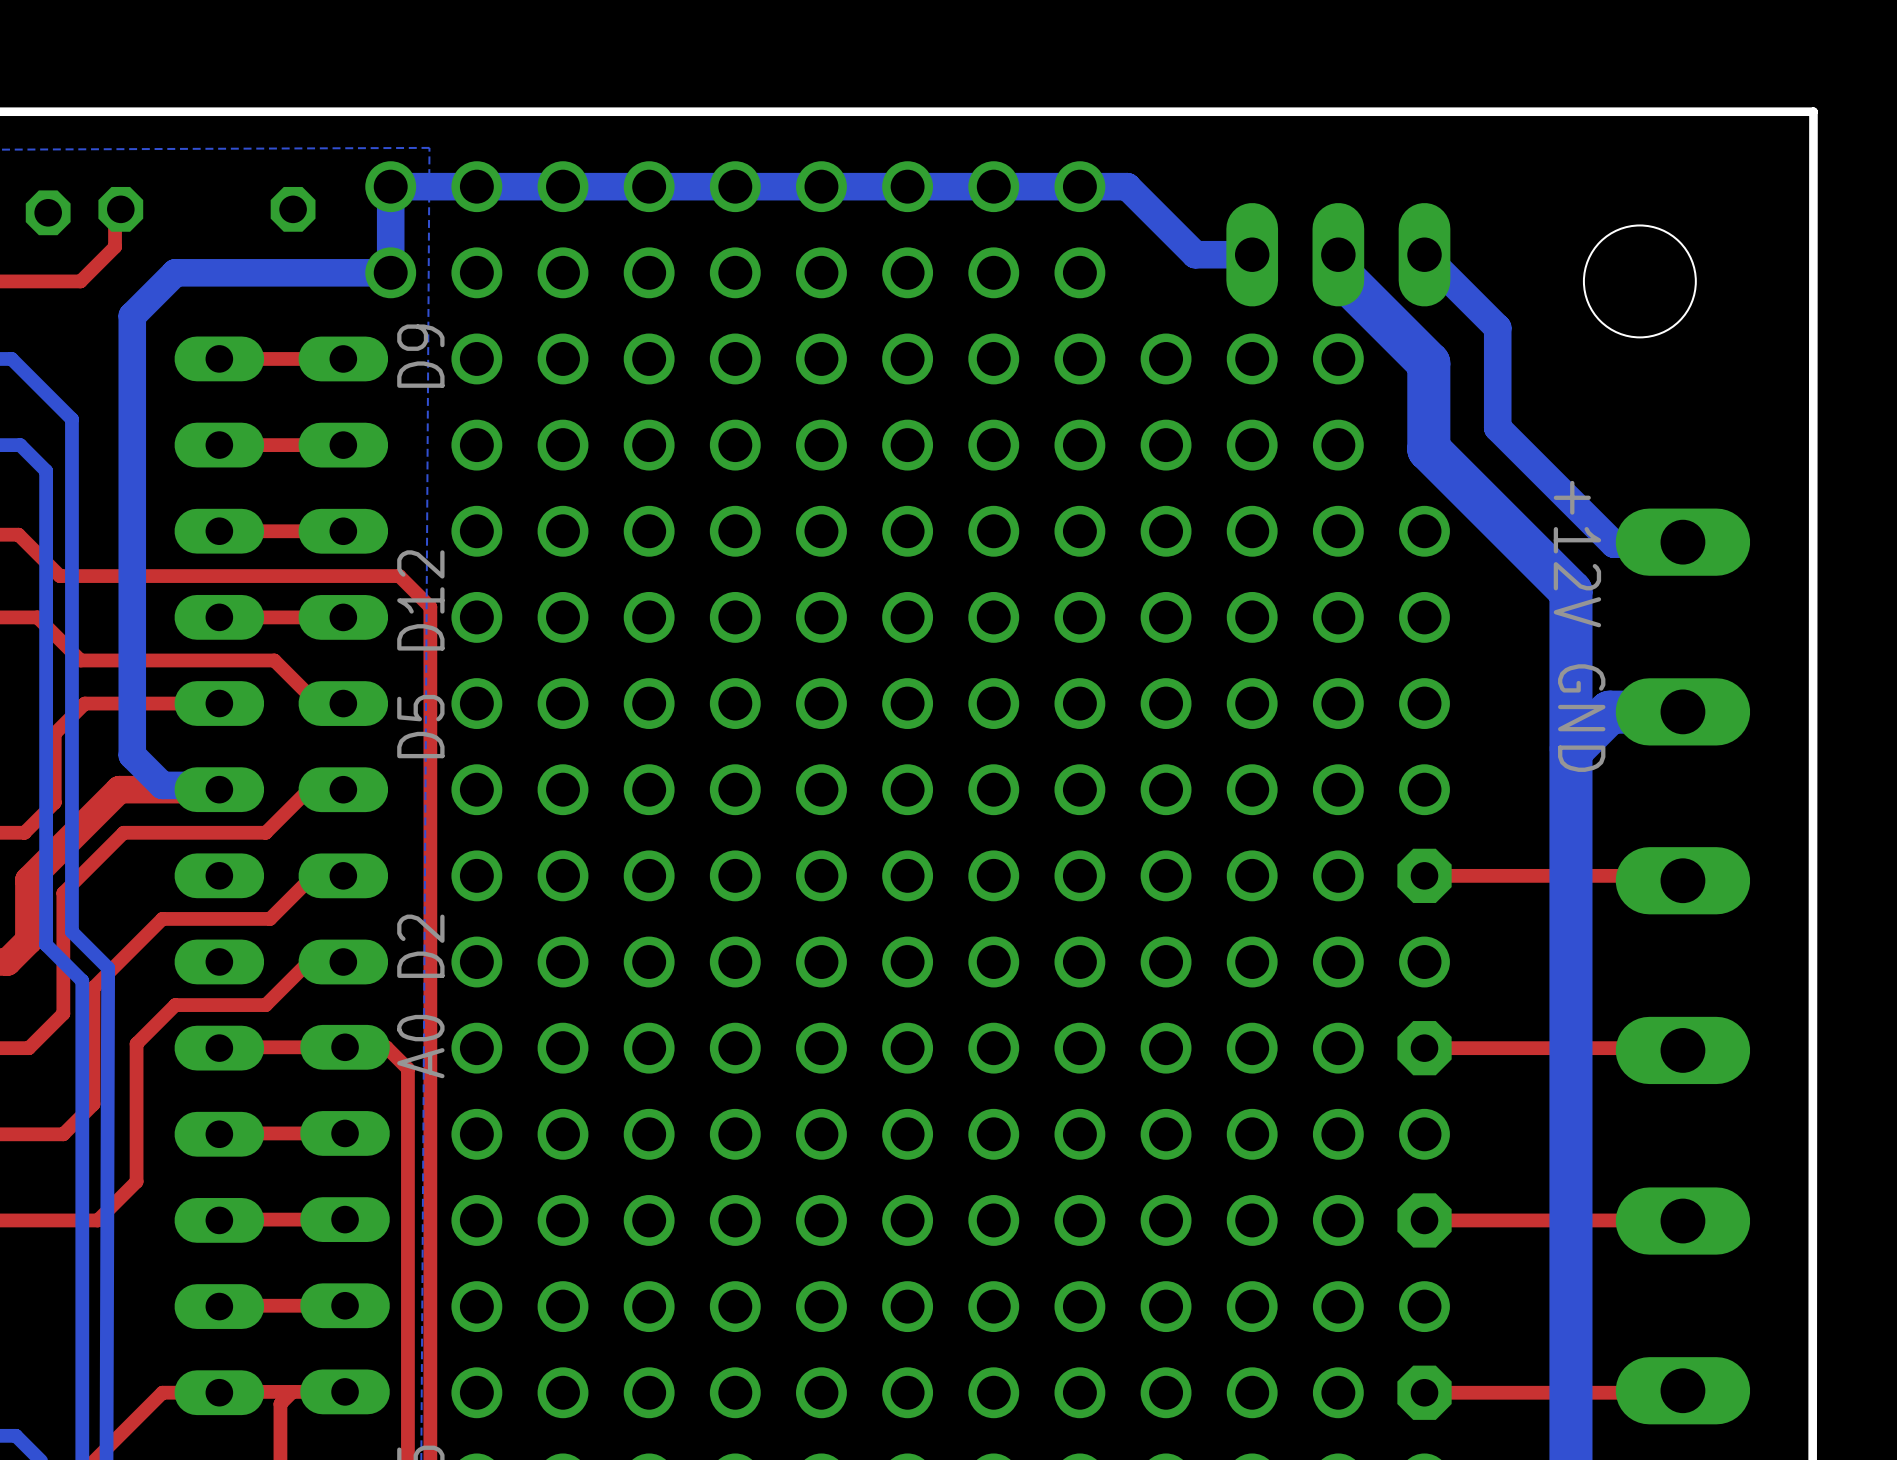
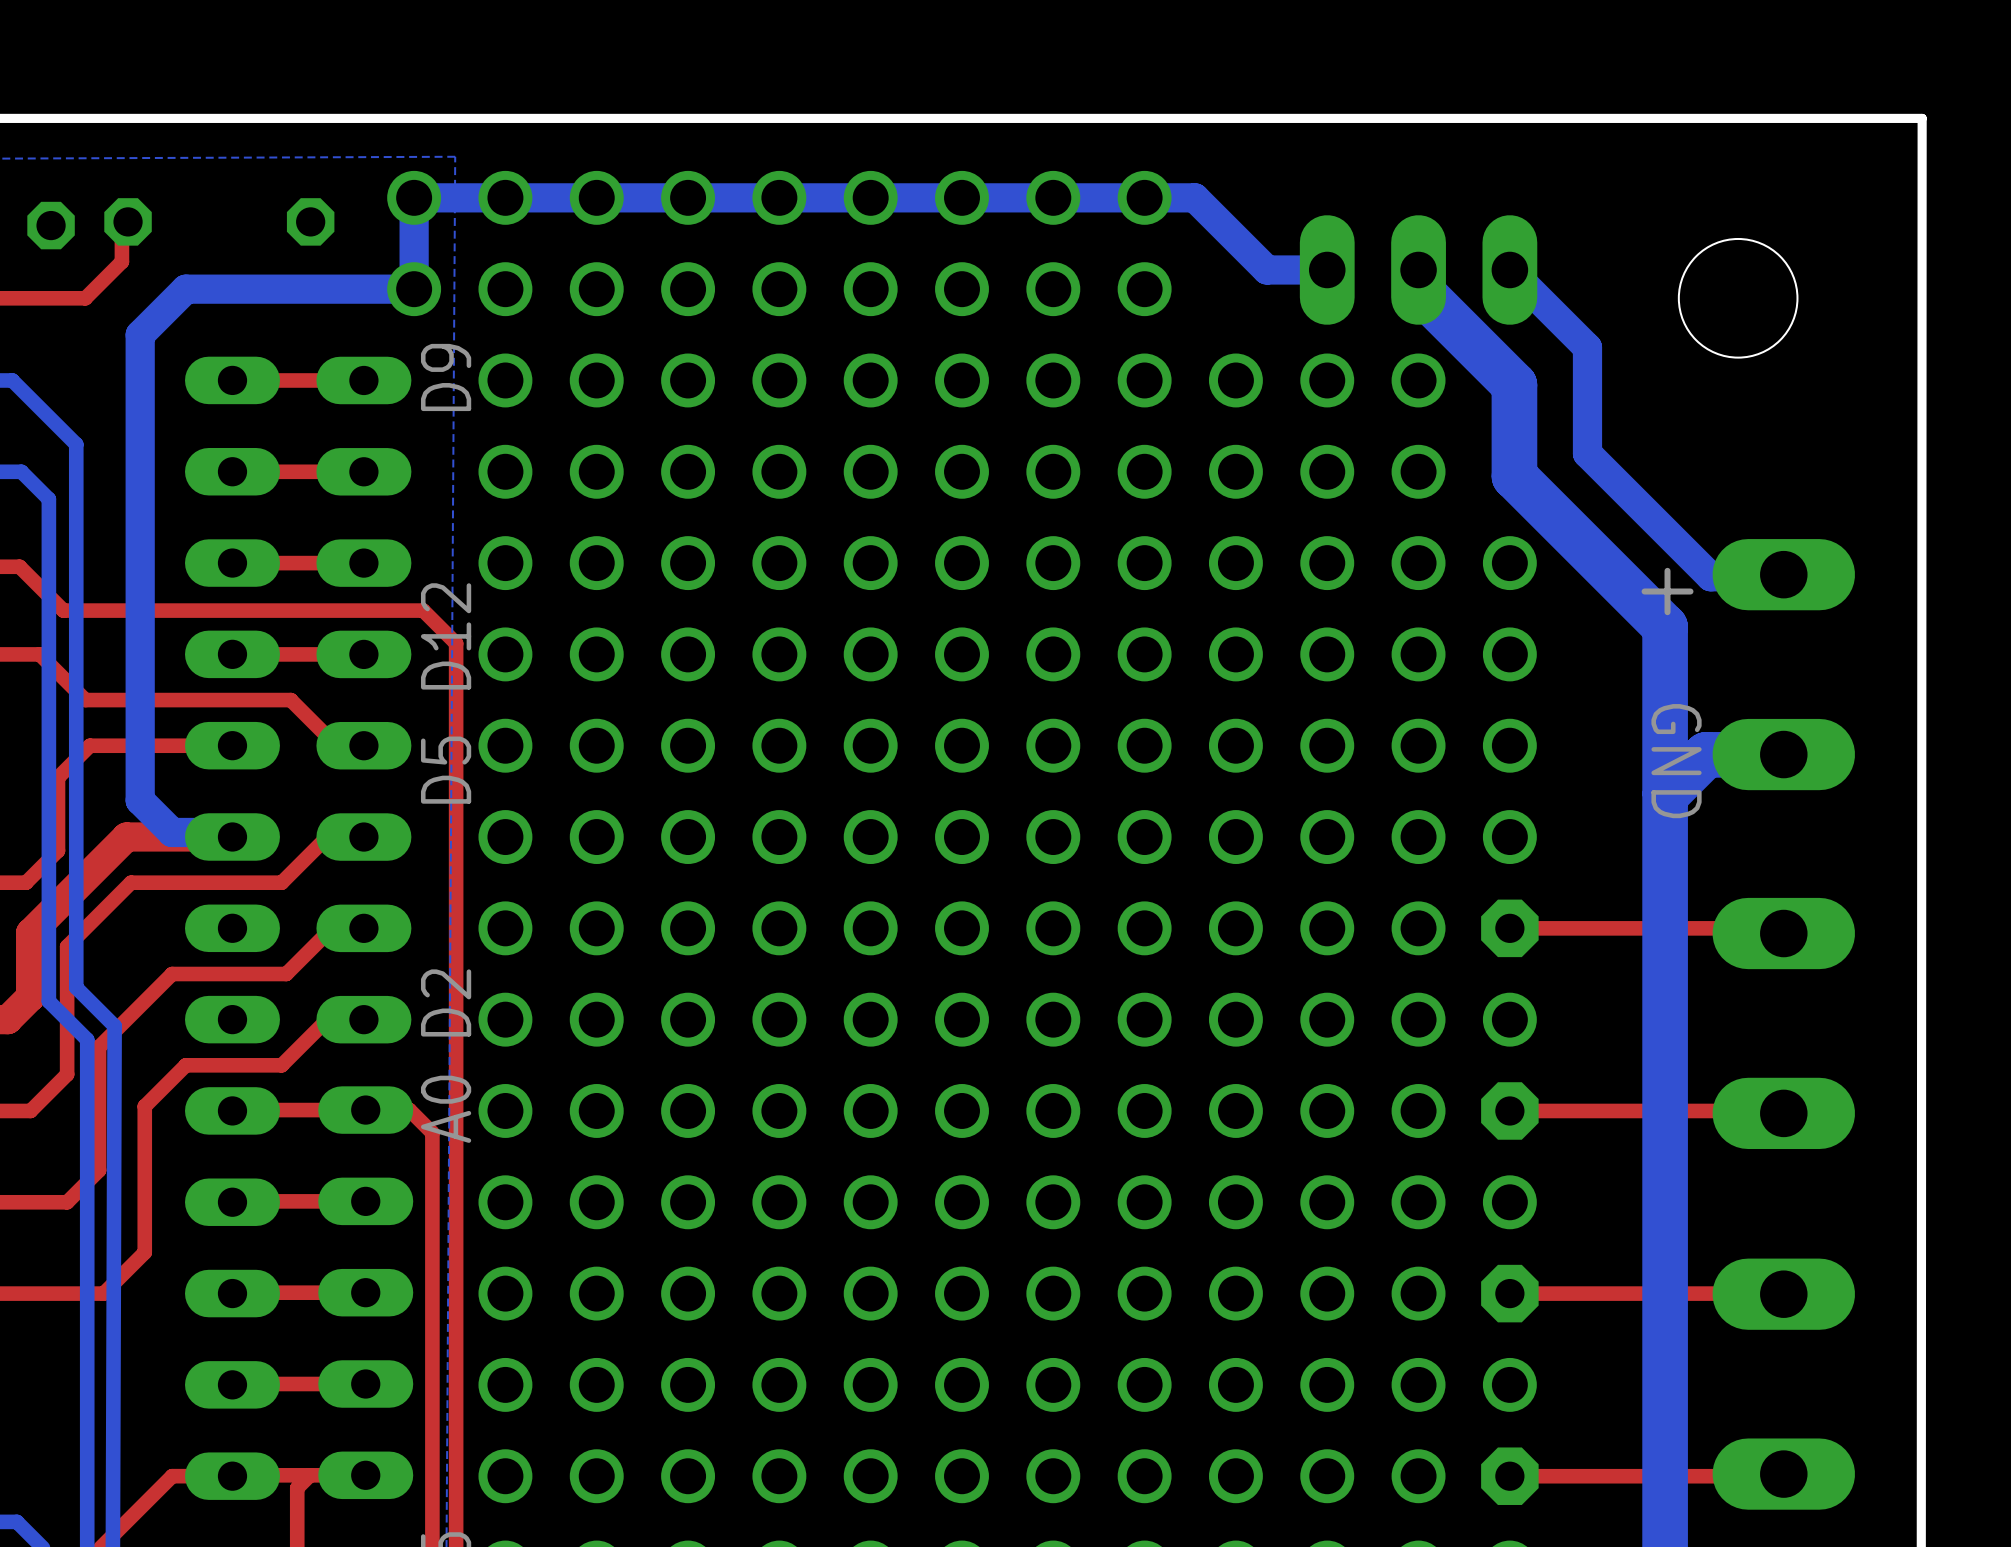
text: +12V (1577, 554) -> none
text: none -> + (1667, 591)

